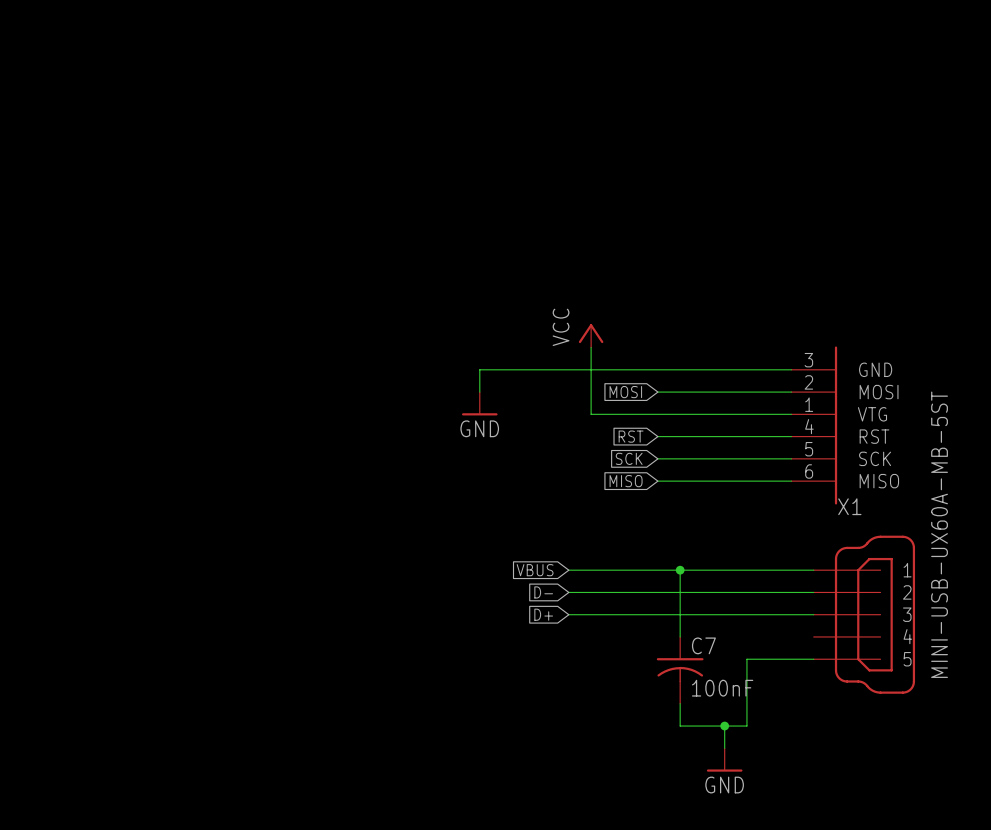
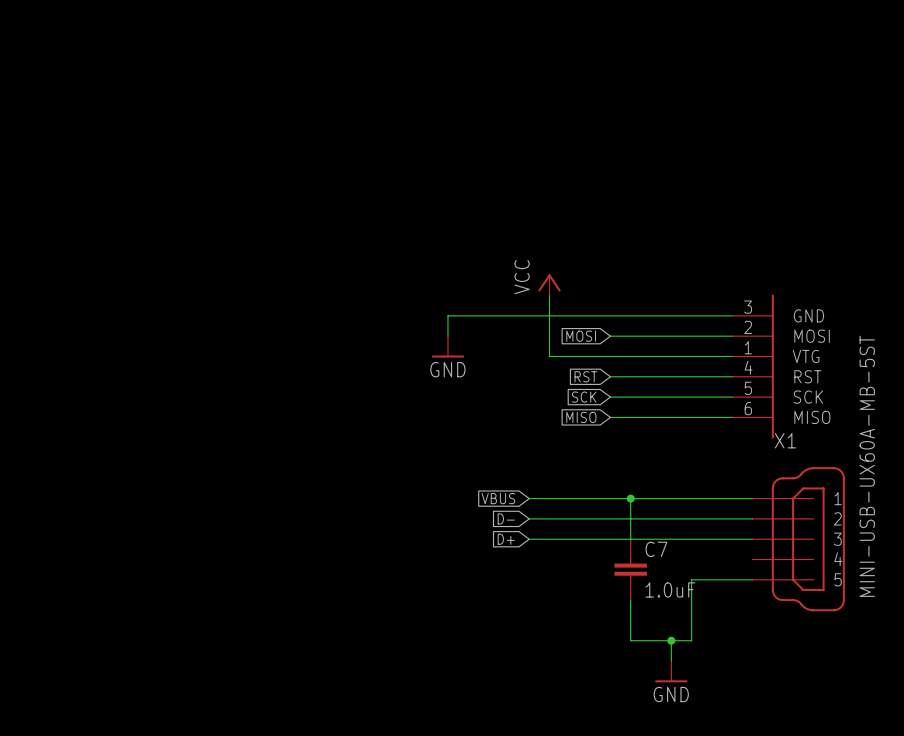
C7 symbol: [656, 636, 704, 704] -> [614, 539, 647, 601]
C7 value: 100nF (722, 688) -> 1.0uF (670, 589)

